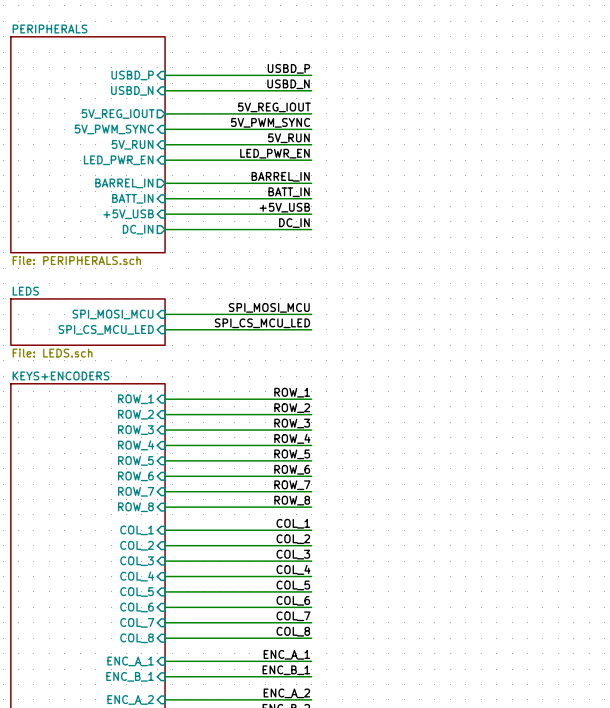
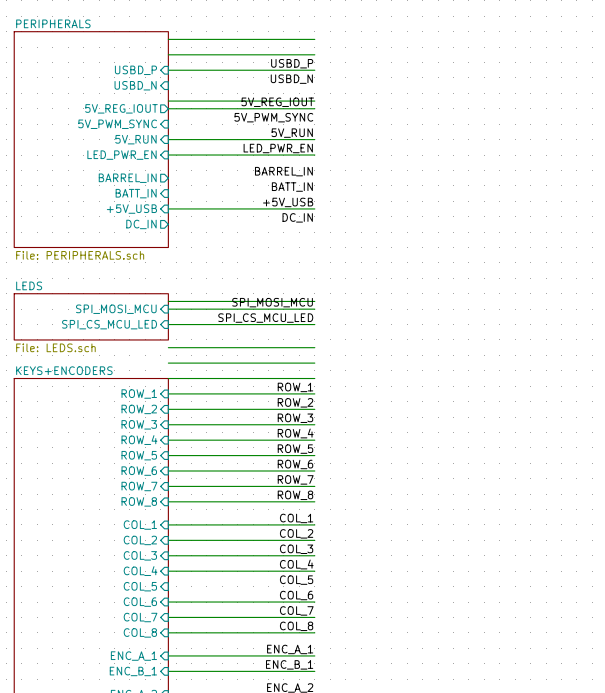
wire: (165, 90) (311, 90) -> (168, 39) (314, 39)
wire: (165, 129) (311, 129) -> none
wire: (165, 183) (311, 183) -> (168, 301) (314, 301)
wire: (165, 198) (311, 198) -> (168, 54) (314, 54)
wire: (165, 229) (311, 229) -> (168, 101) (314, 101)
wire: none -> (168, 347) (314, 347)
wire: none -> (168, 363) (314, 363)
wire: none -> (168, 378) (314, 378)
wire: (165, 591) (311, 591) -> none

